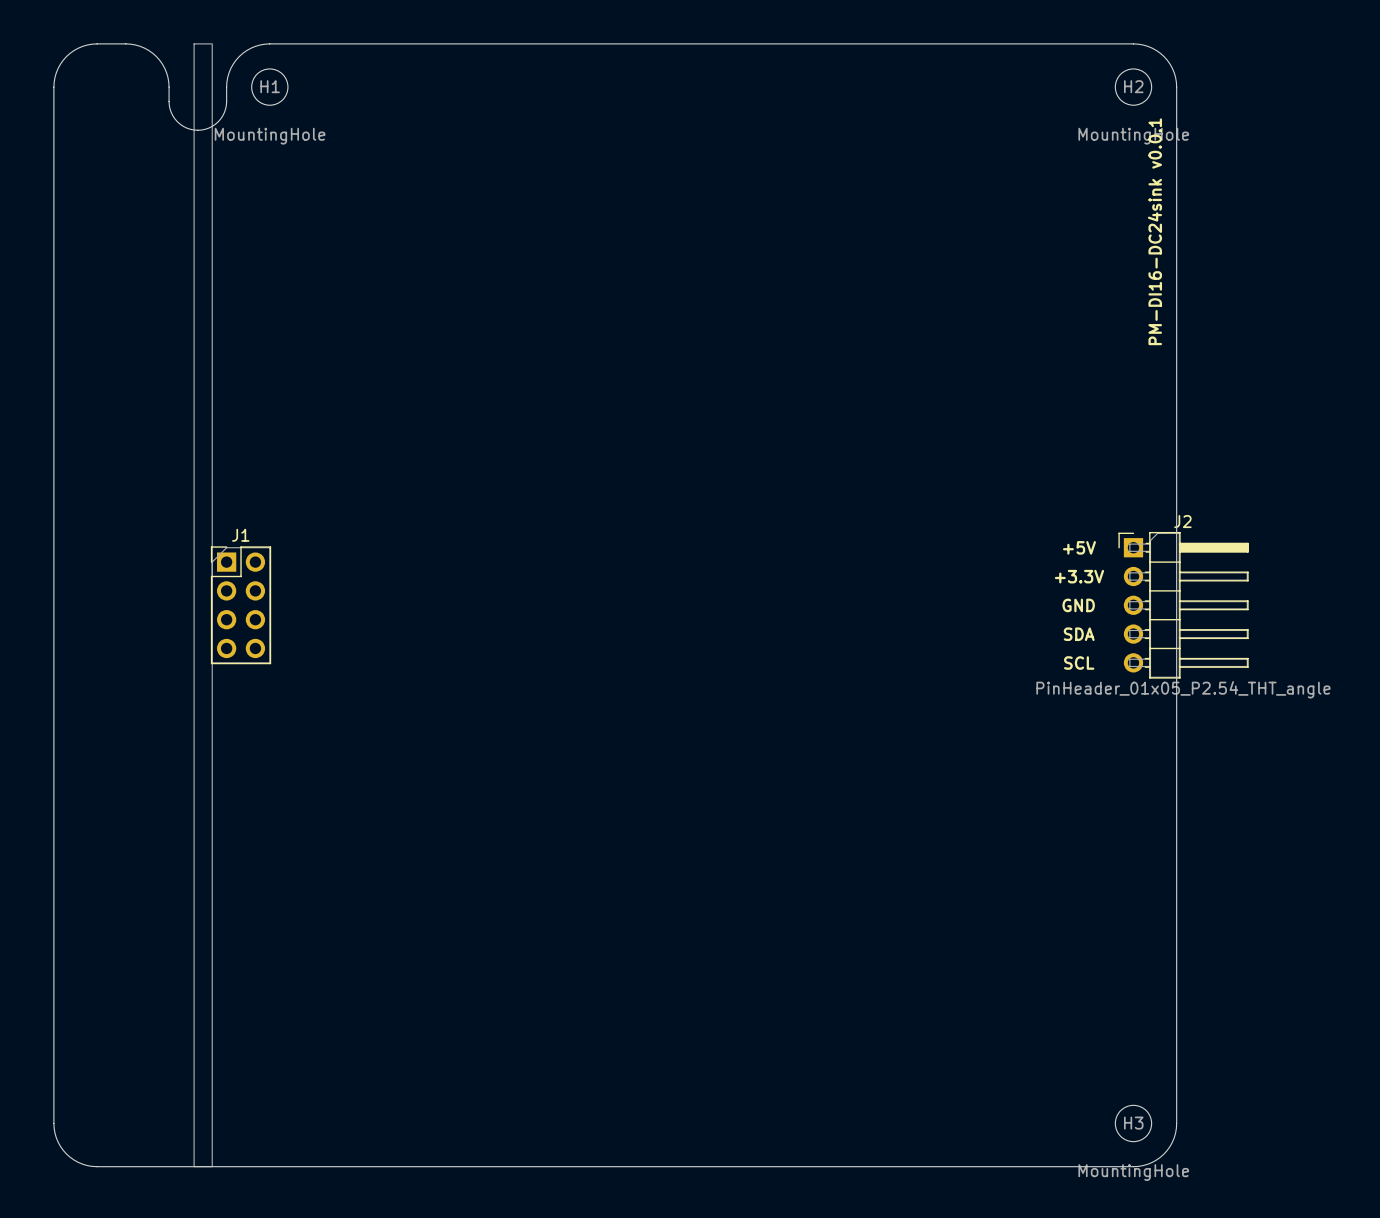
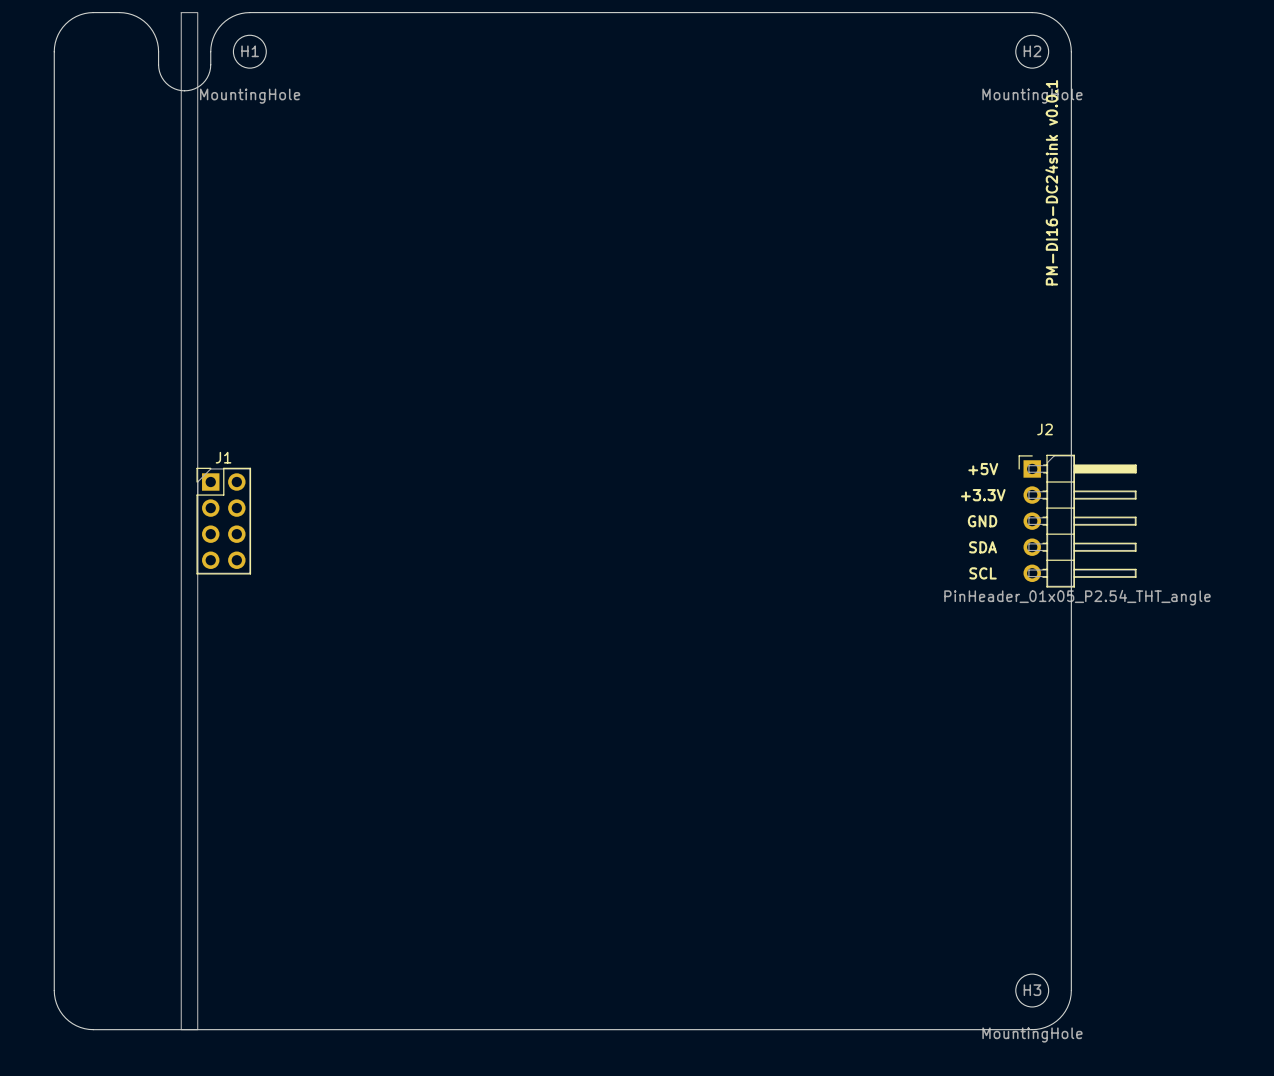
J2 name position: J2 (1182, 521) -> J2 (1045, 429)

